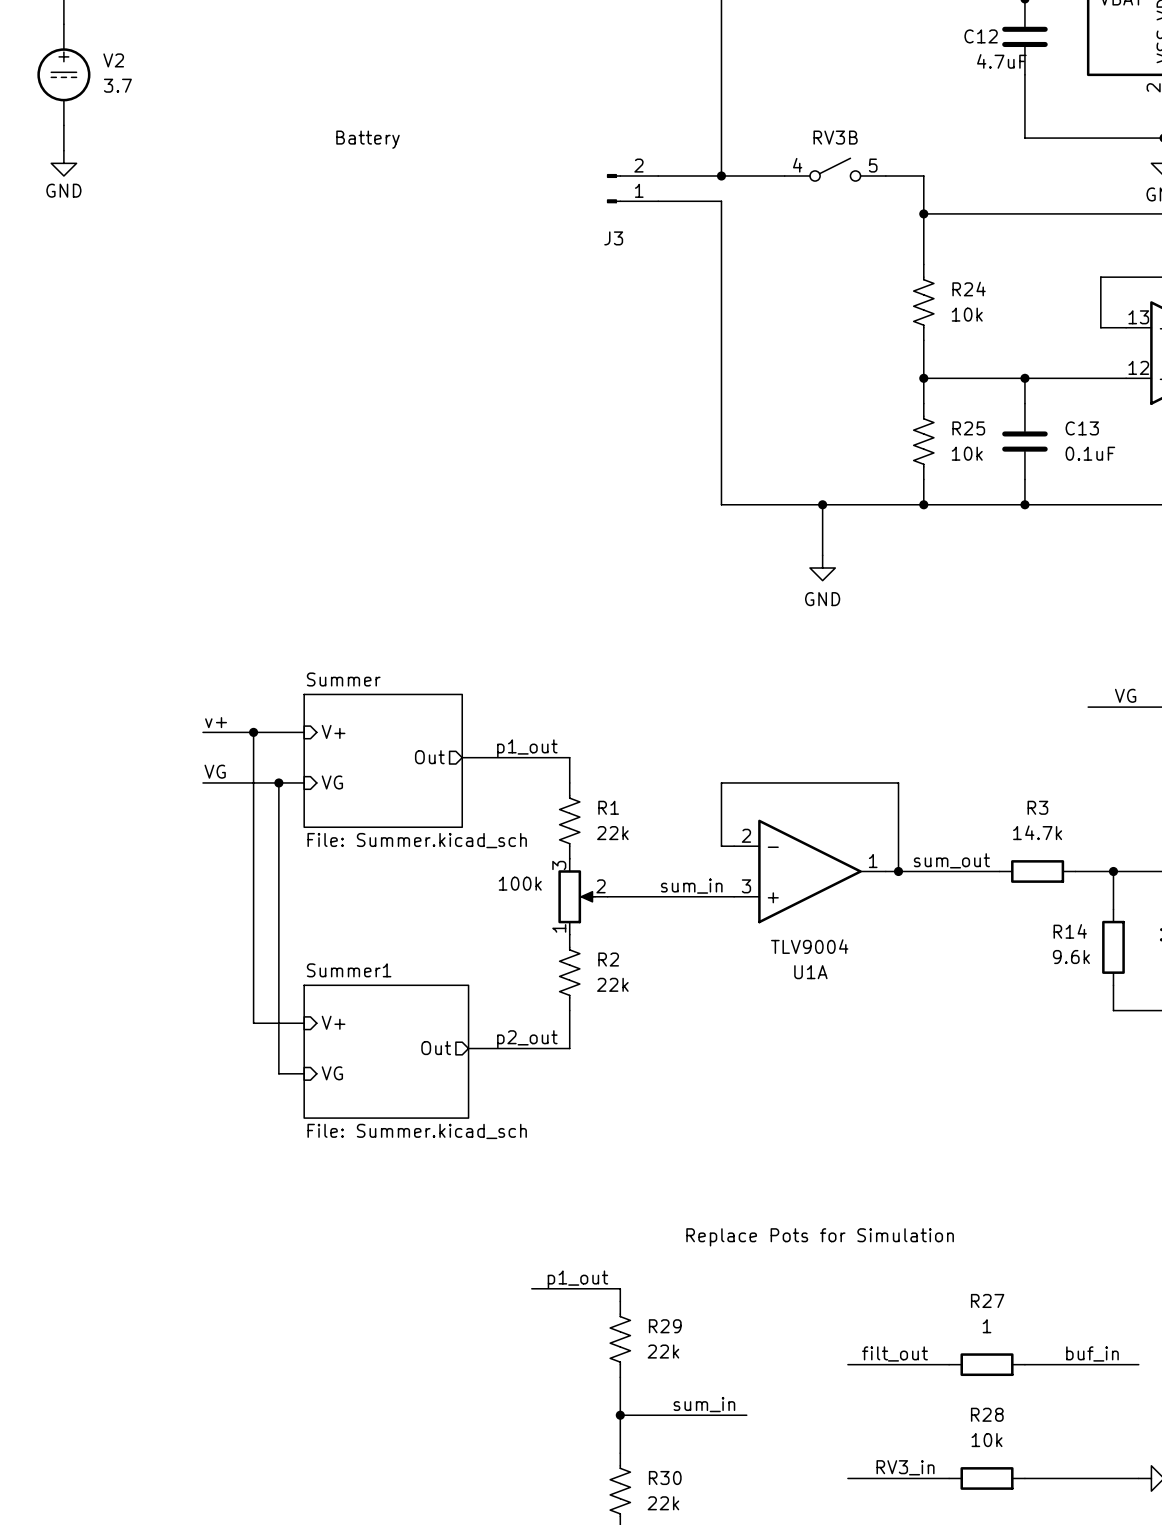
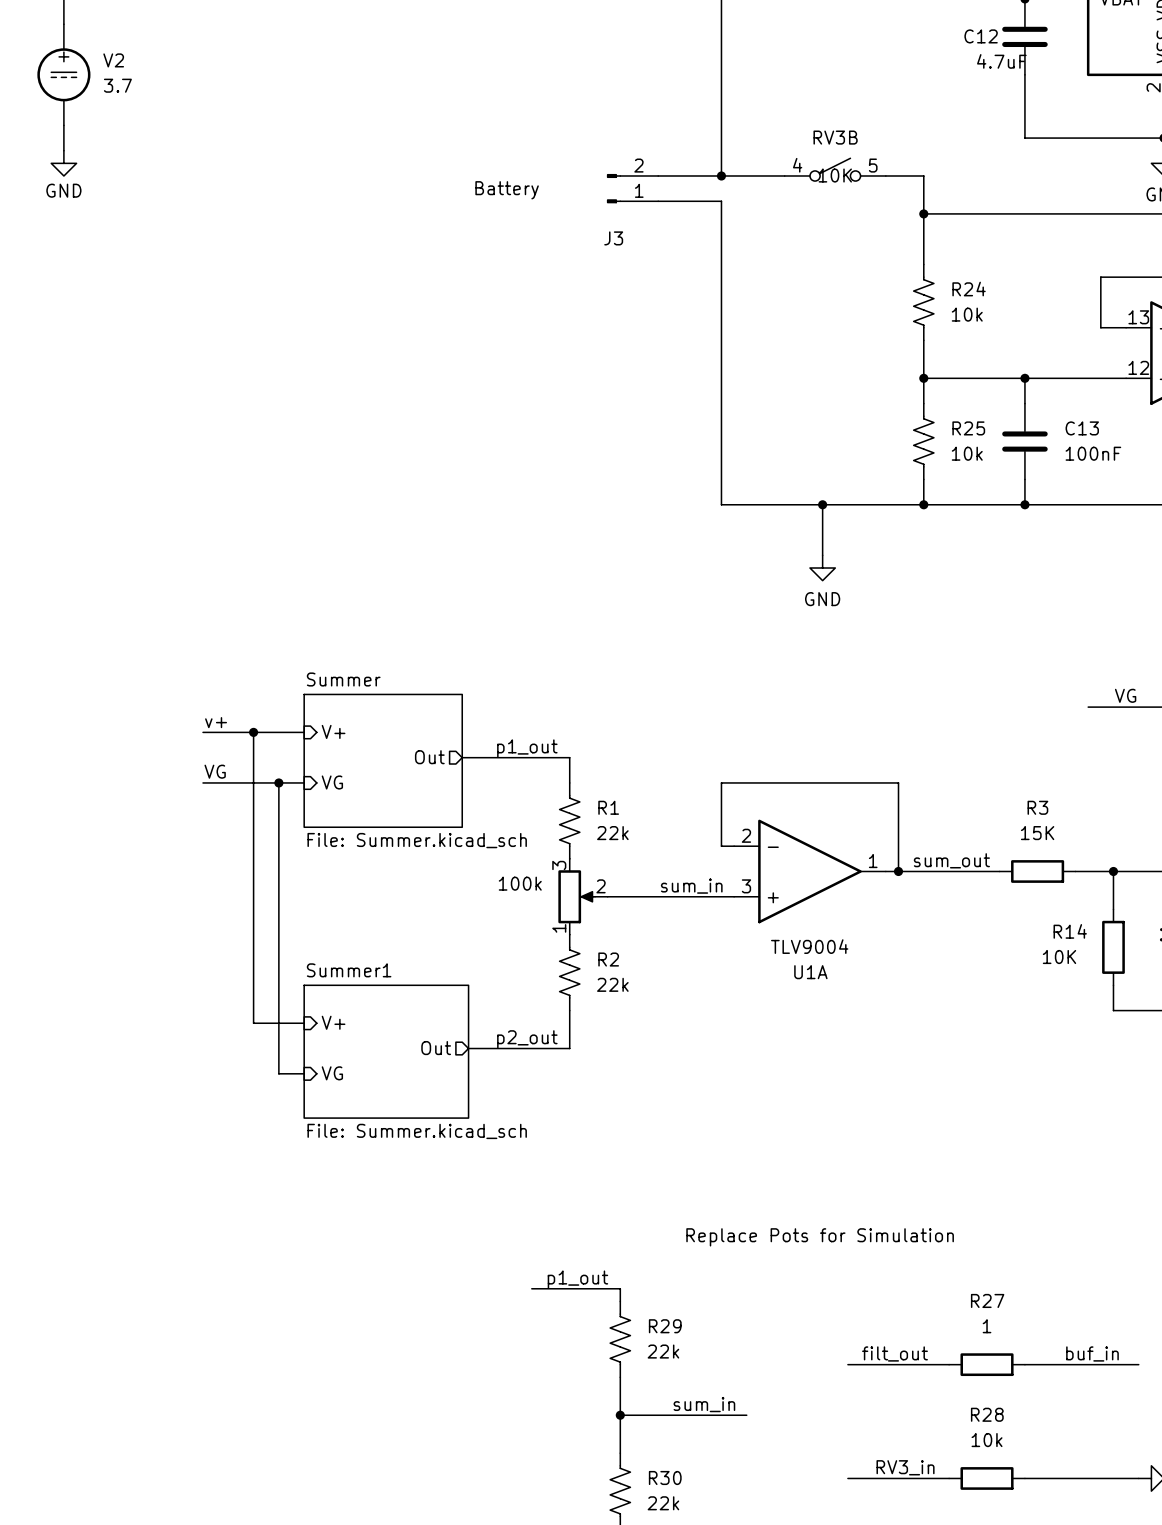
J3 value position: Battery (368, 139) -> Battery (507, 190)
RV3B value: none -> 10K (835, 175)
C13 value: 0.1uF (1090, 453) -> 100nF (1093, 453)
R3 value: 14.7k (1037, 832) -> 15K (1037, 833)
R14 value: 9.6k (1071, 957) -> 10K (1059, 957)

